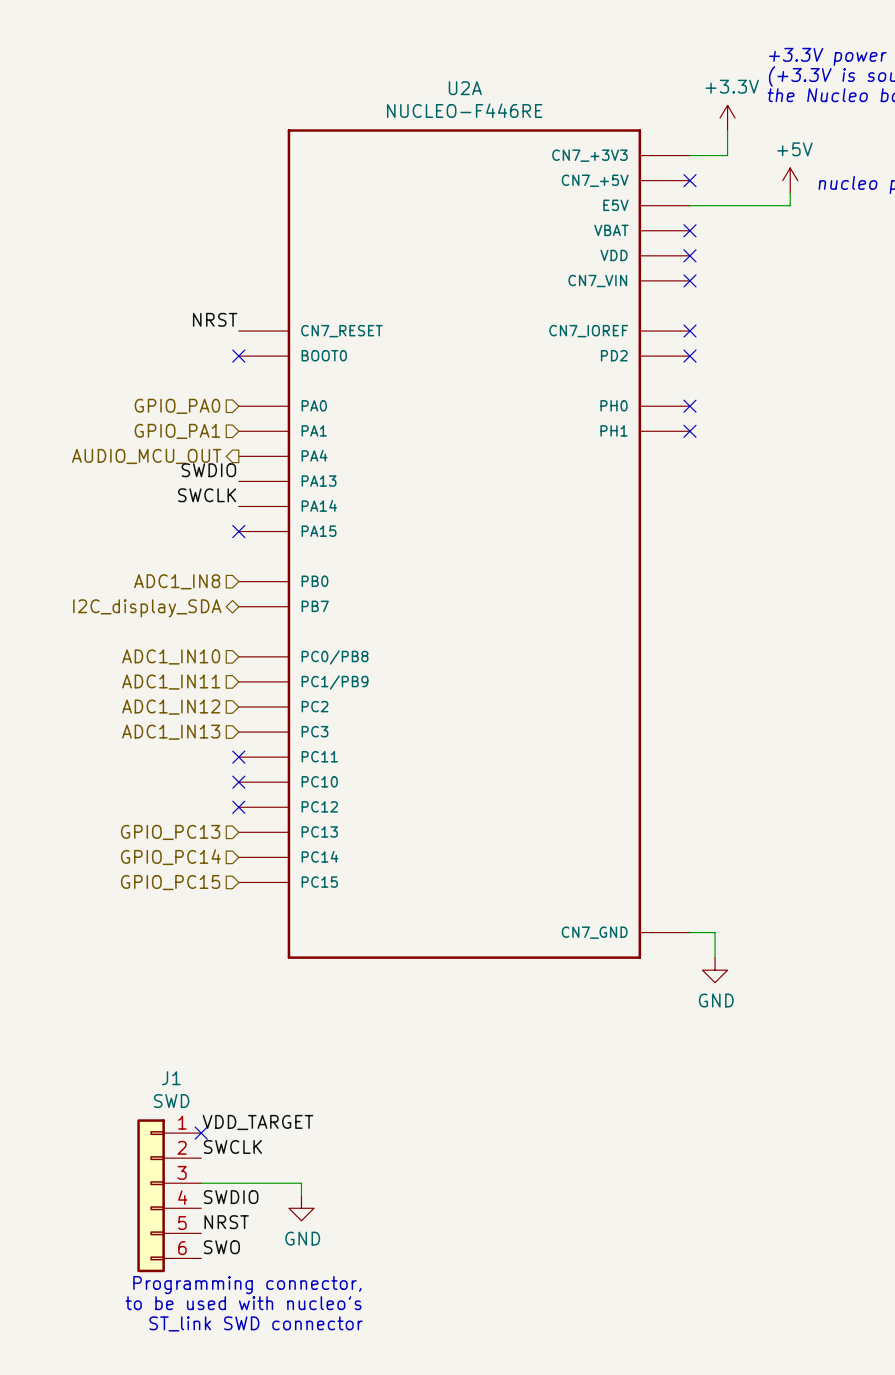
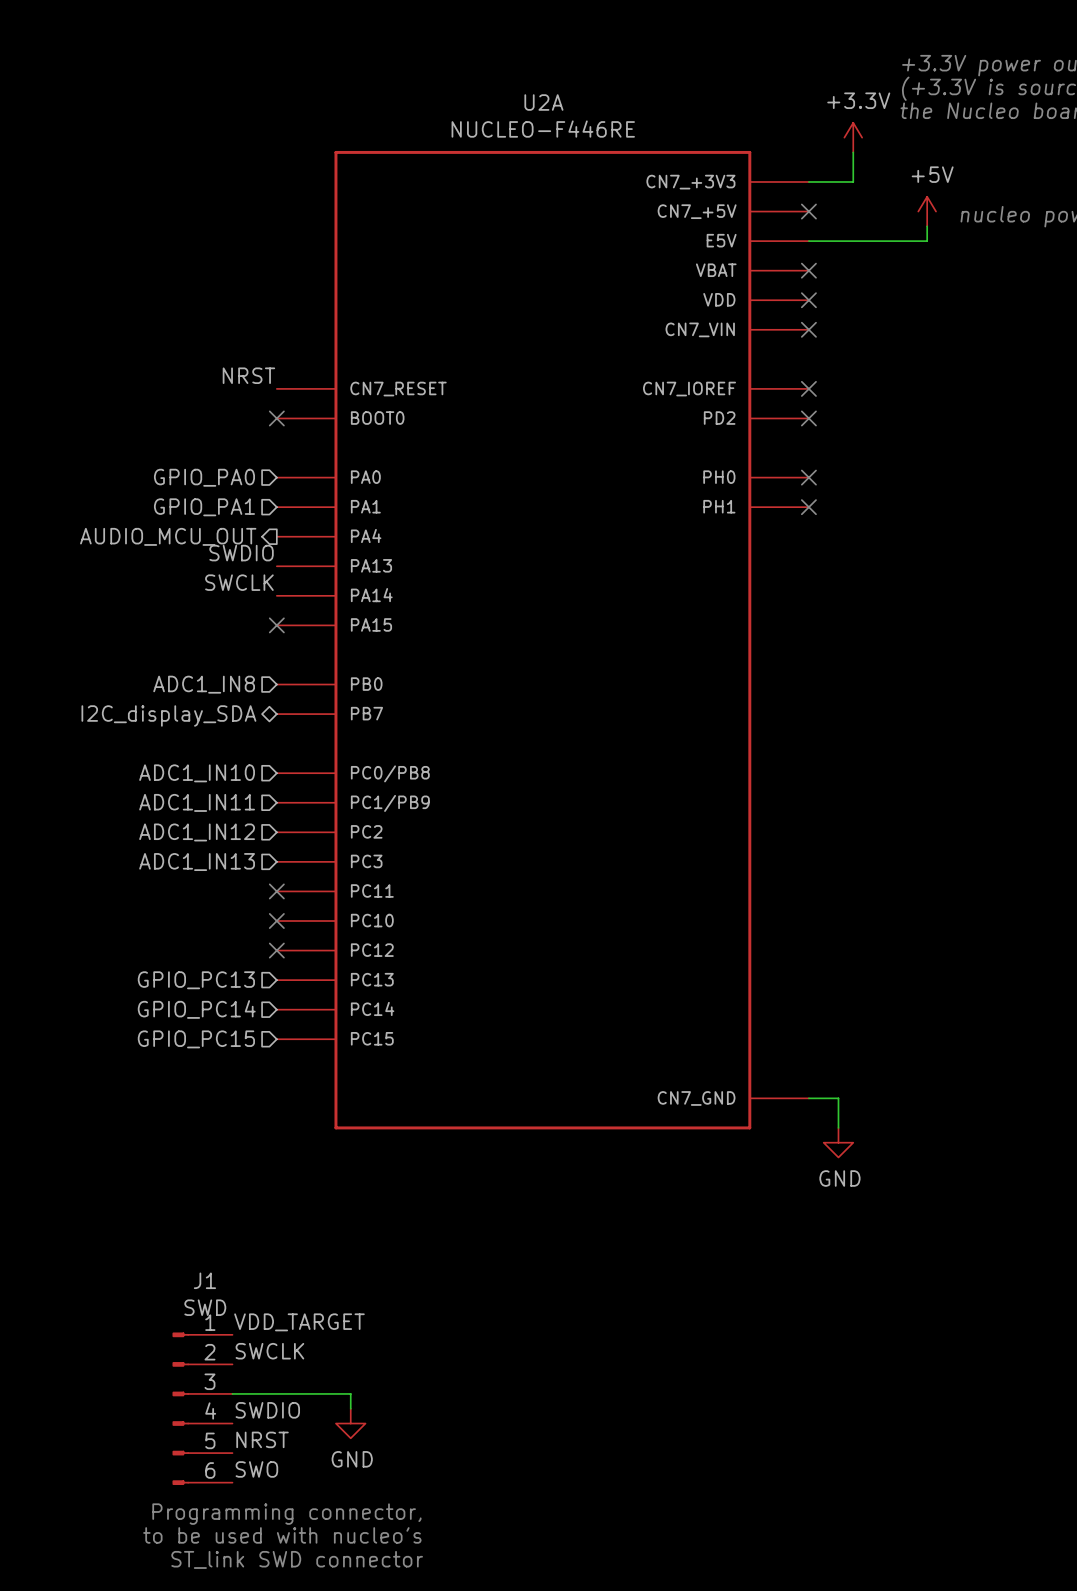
J1 symbol: [137, 1119, 202, 1273] -> [172, 1332, 233, 1486]
no-connect mark: (201, 1133) -> none

